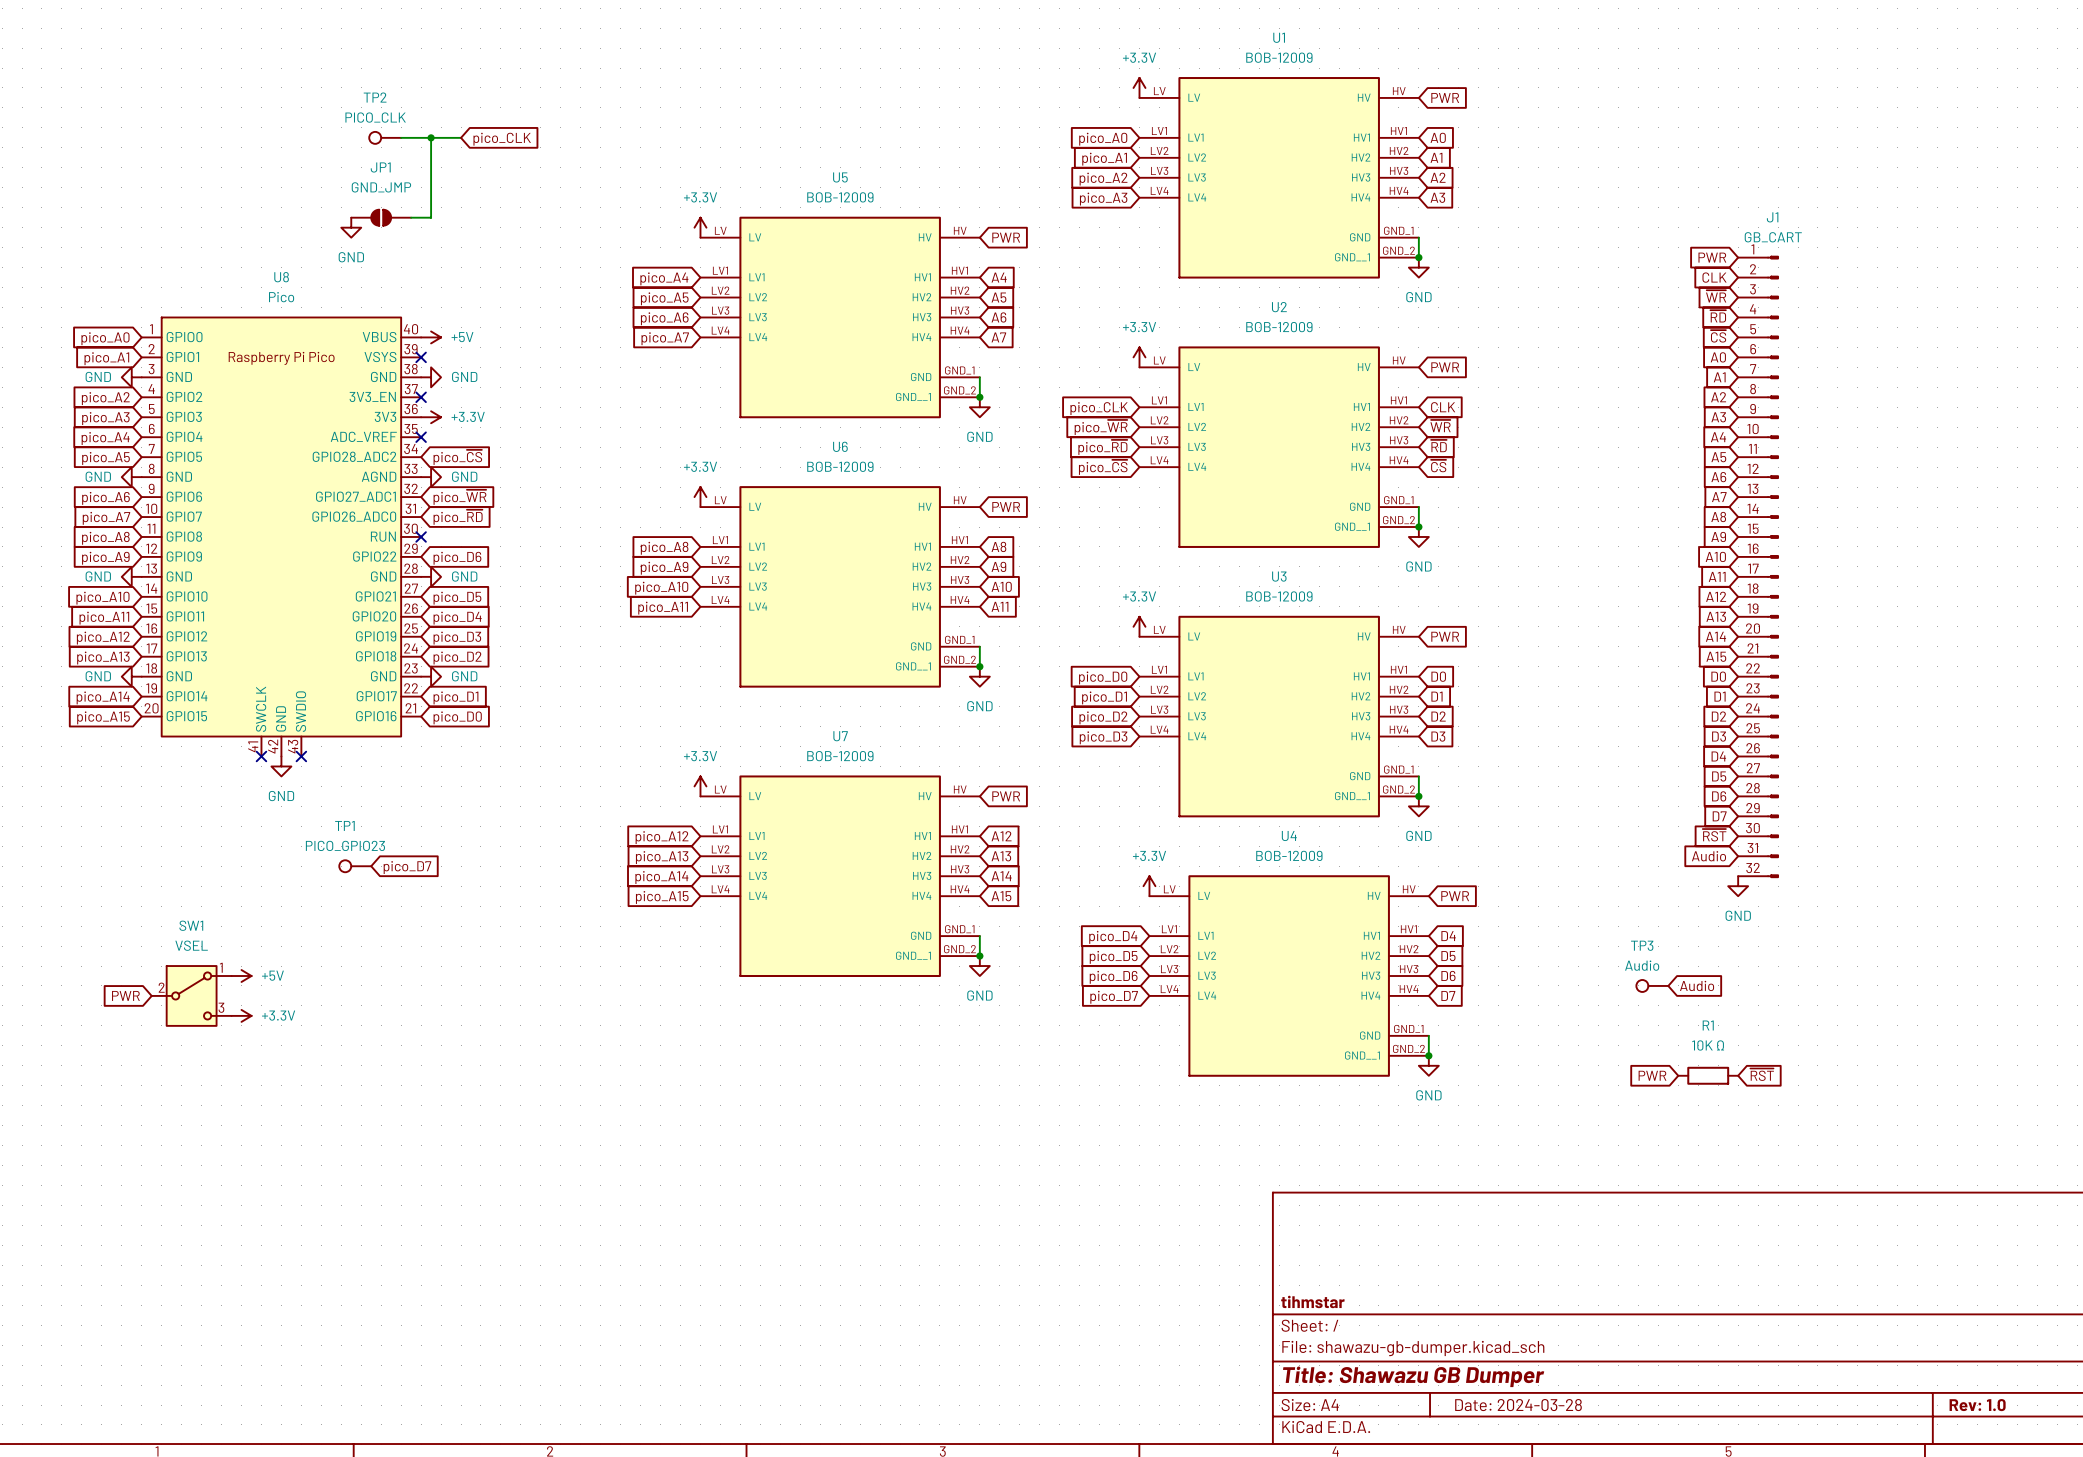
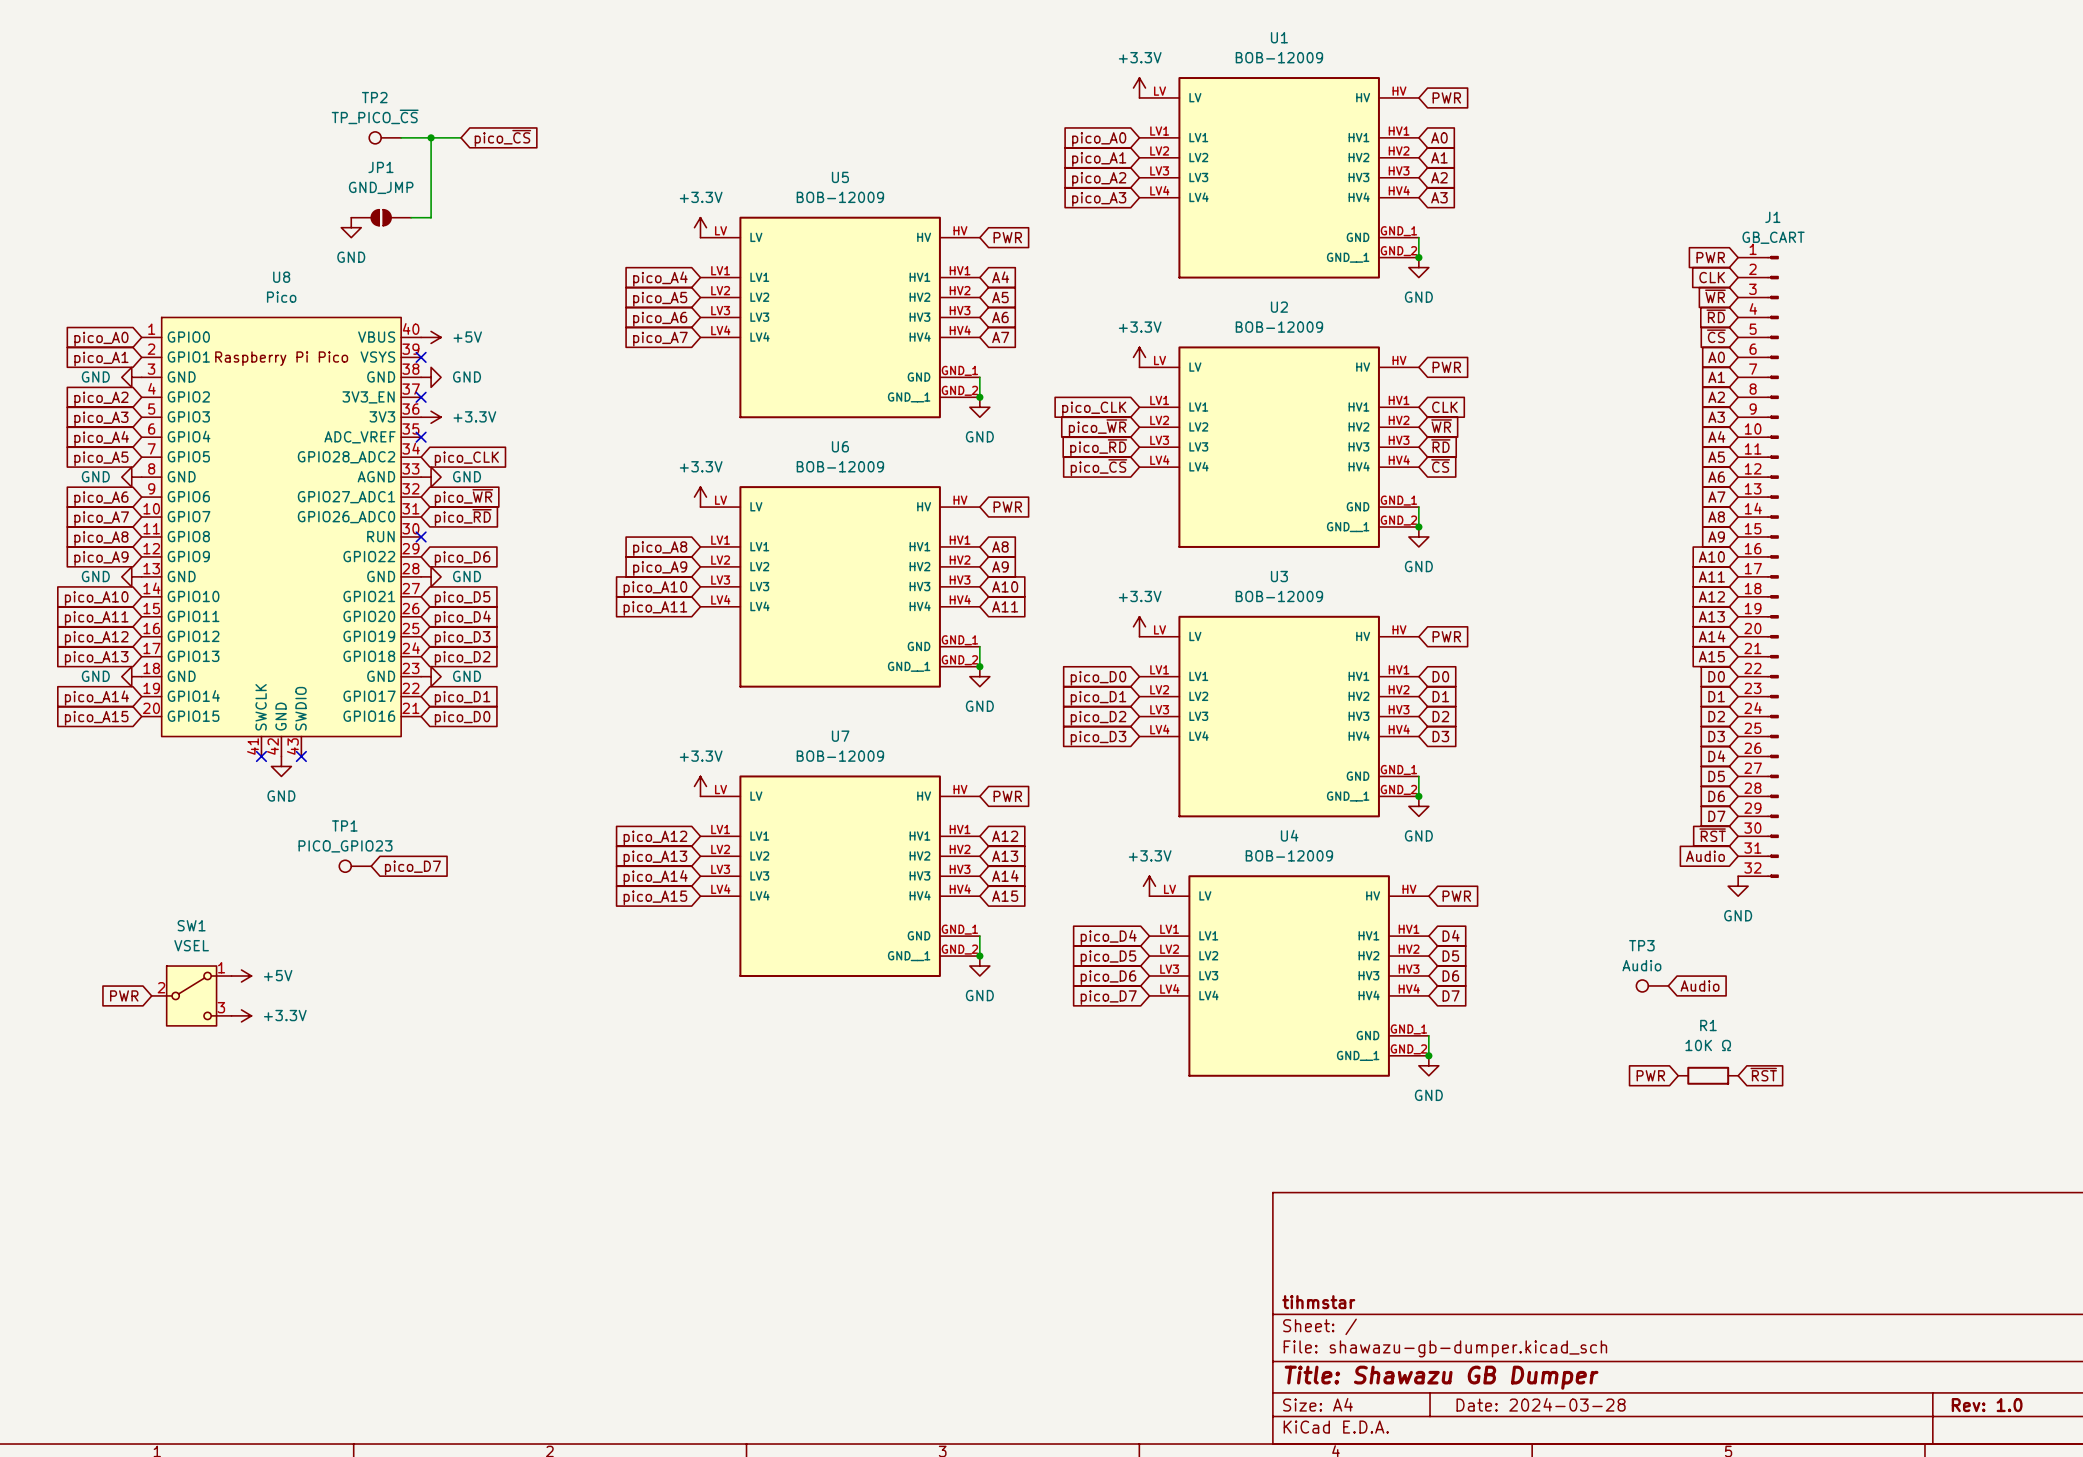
TP2 value: PICO_CLK (375, 117) -> TP_PICO_~{CS} (375, 116)
global label: pico_CLK (502, 139) -> pico_~{CS} (502, 138)
global label: pico_~{CS} (457, 457) -> pico_CLK (466, 458)

